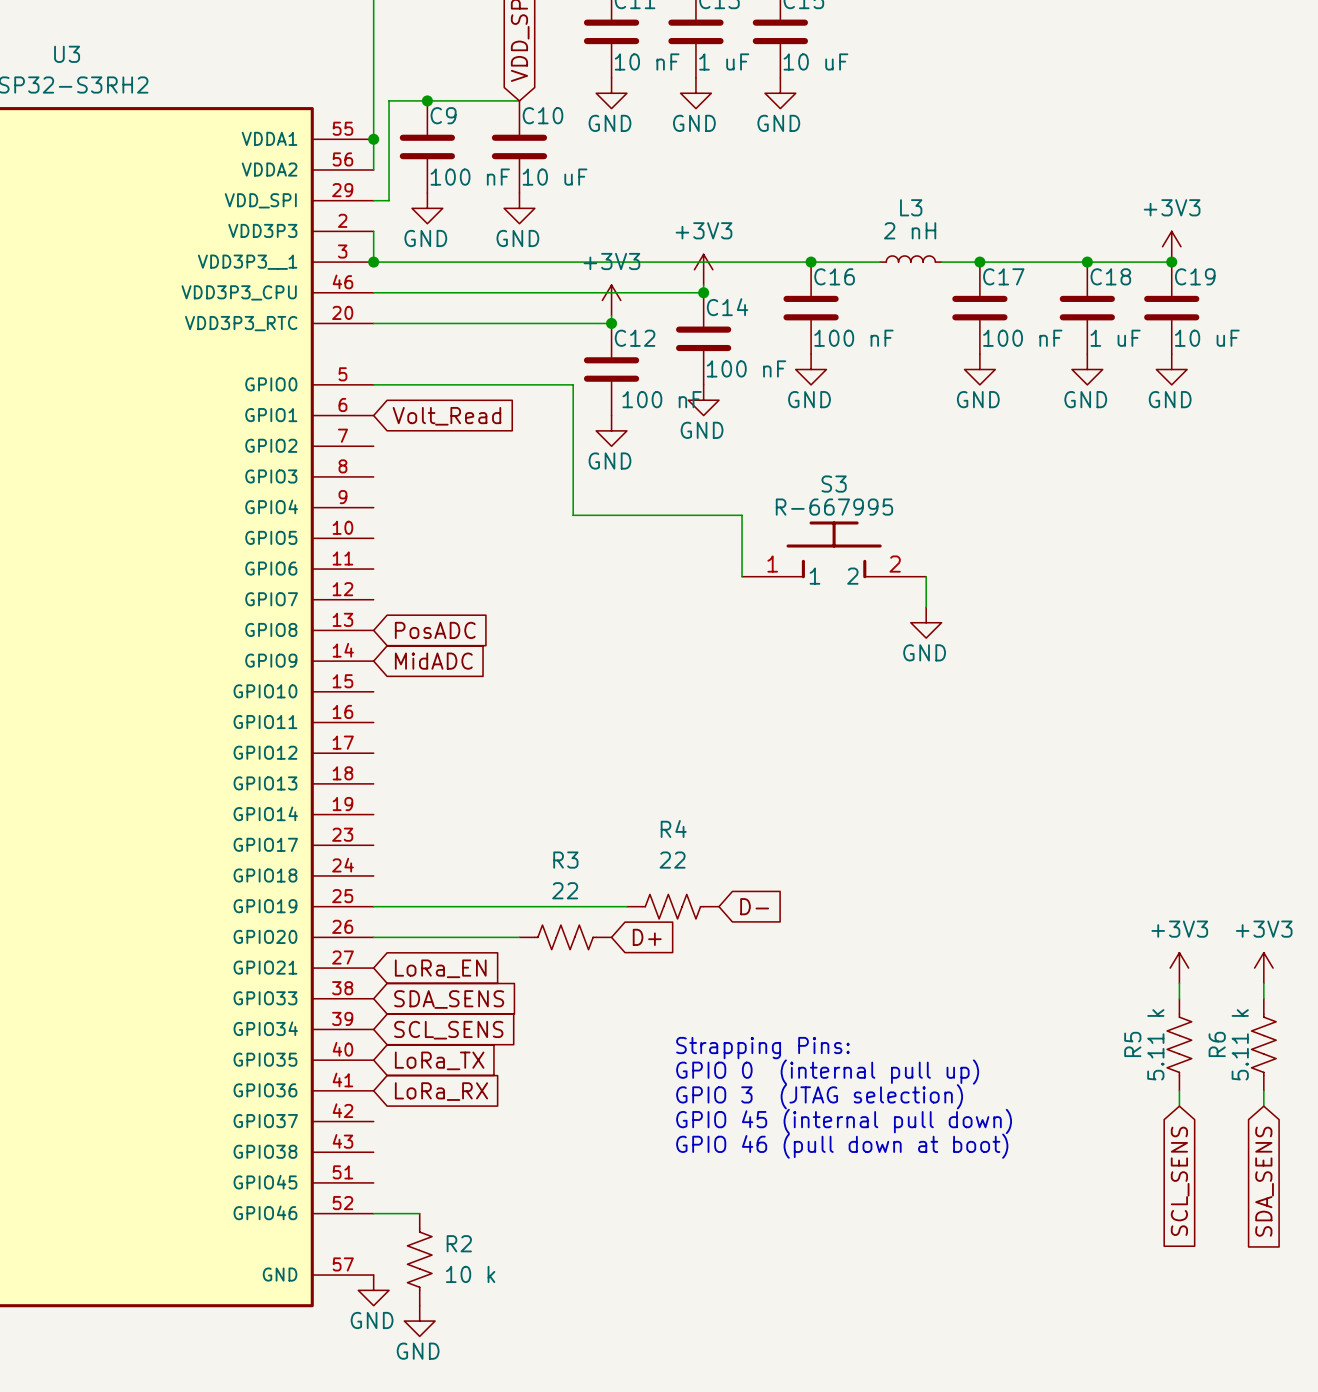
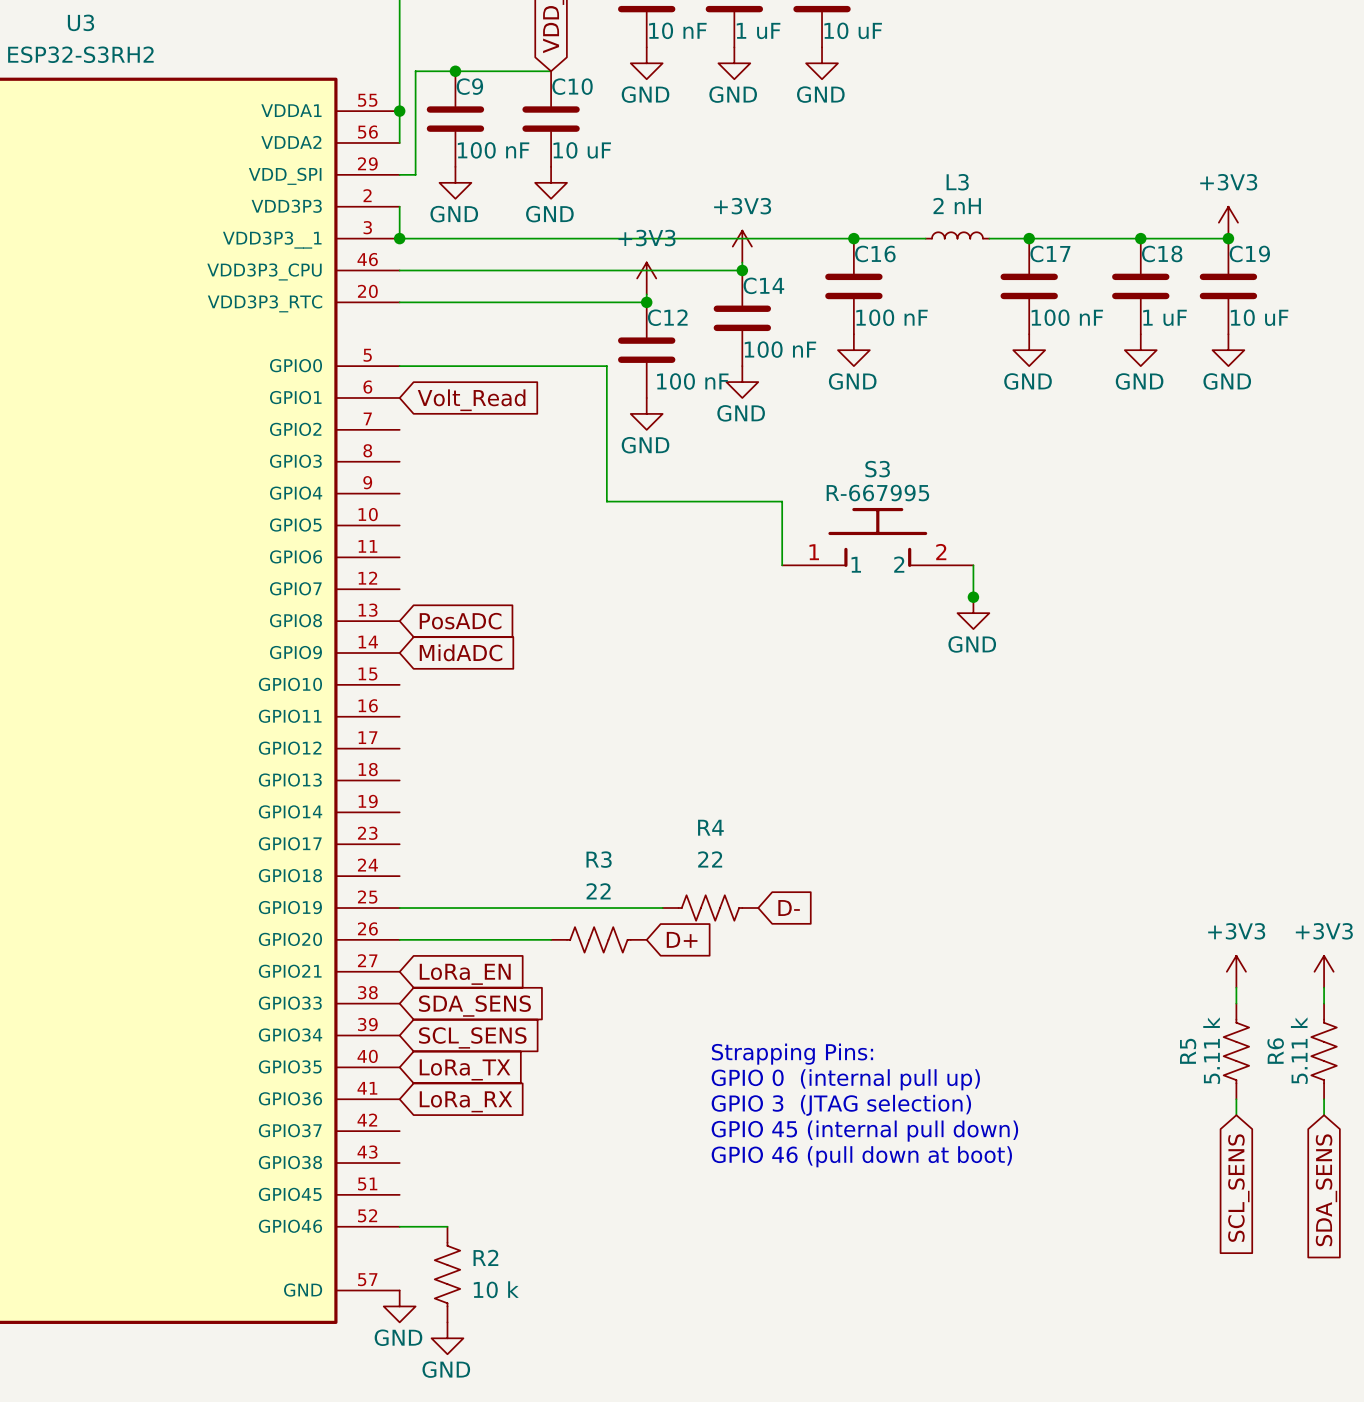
junction: none -> (973, 597)

